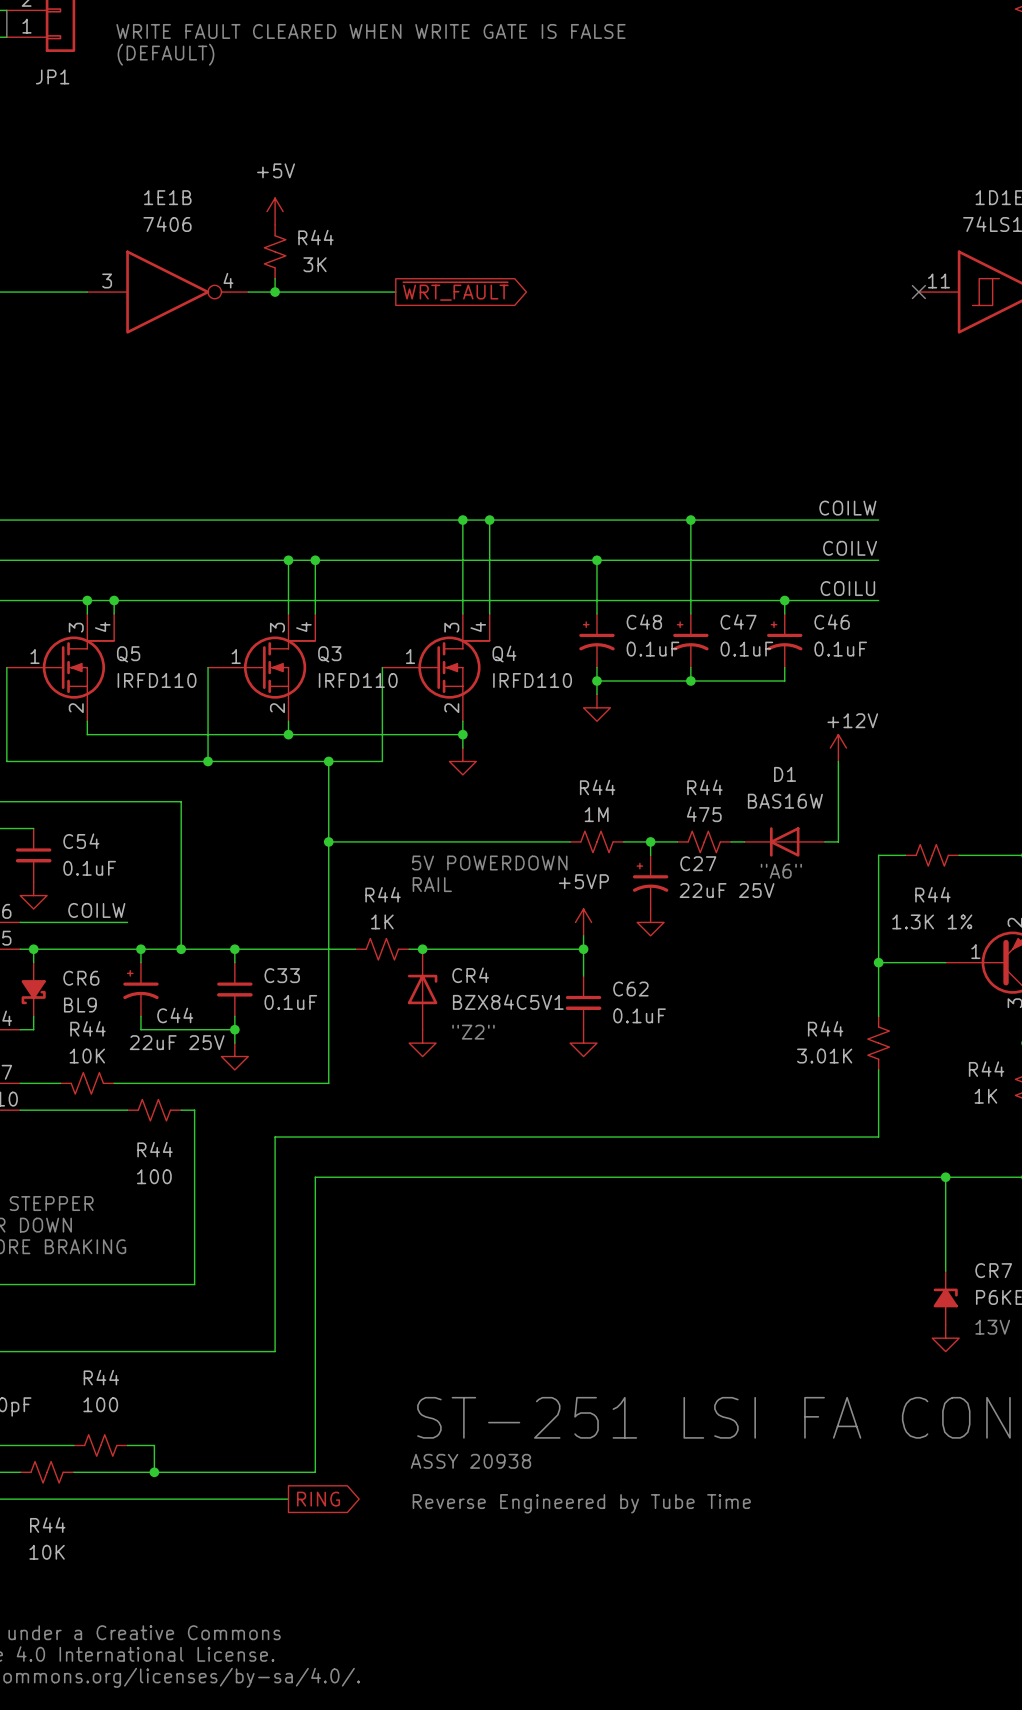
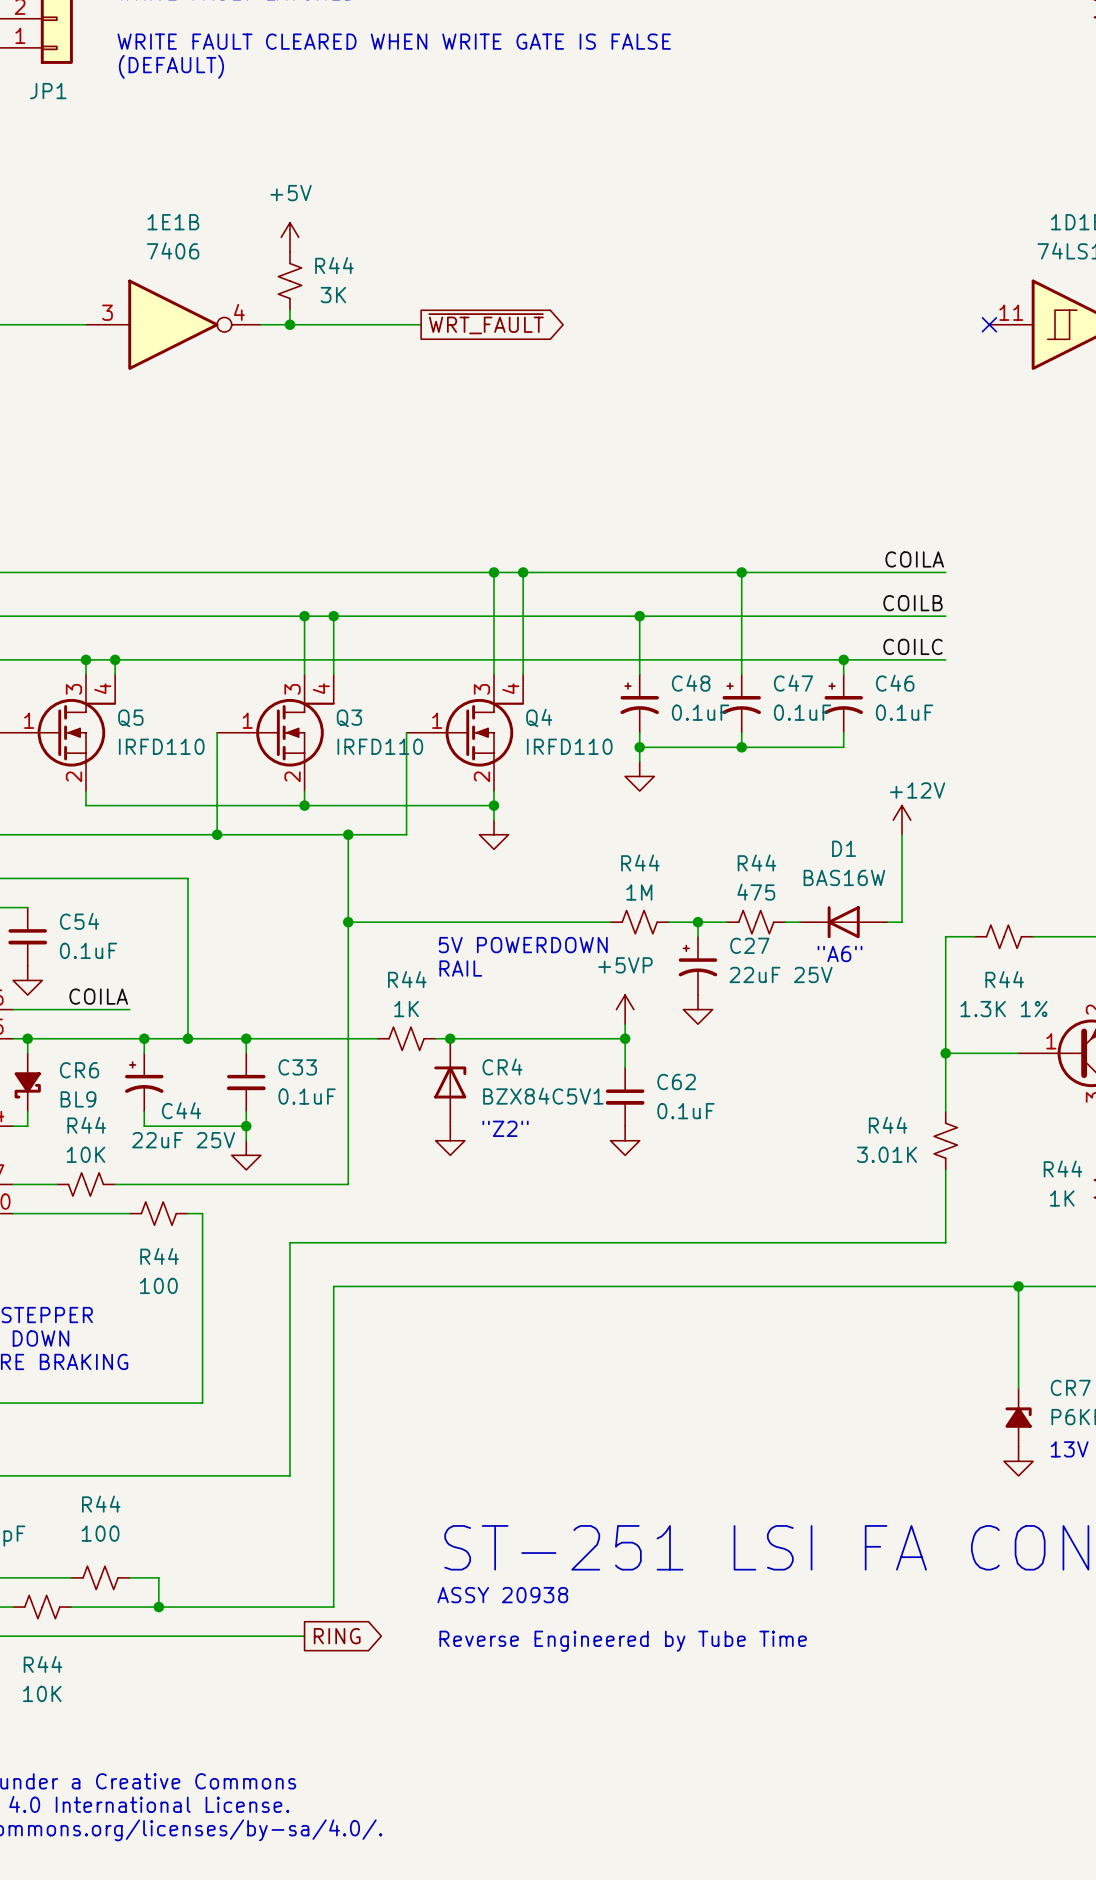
label: COILW (847, 508) -> COILA (914, 559)
label: COILV (850, 548) -> COILB (912, 603)
label: COILU (847, 588) -> COILC (912, 646)
label: COILW (96, 910) -> COILA (98, 996)

